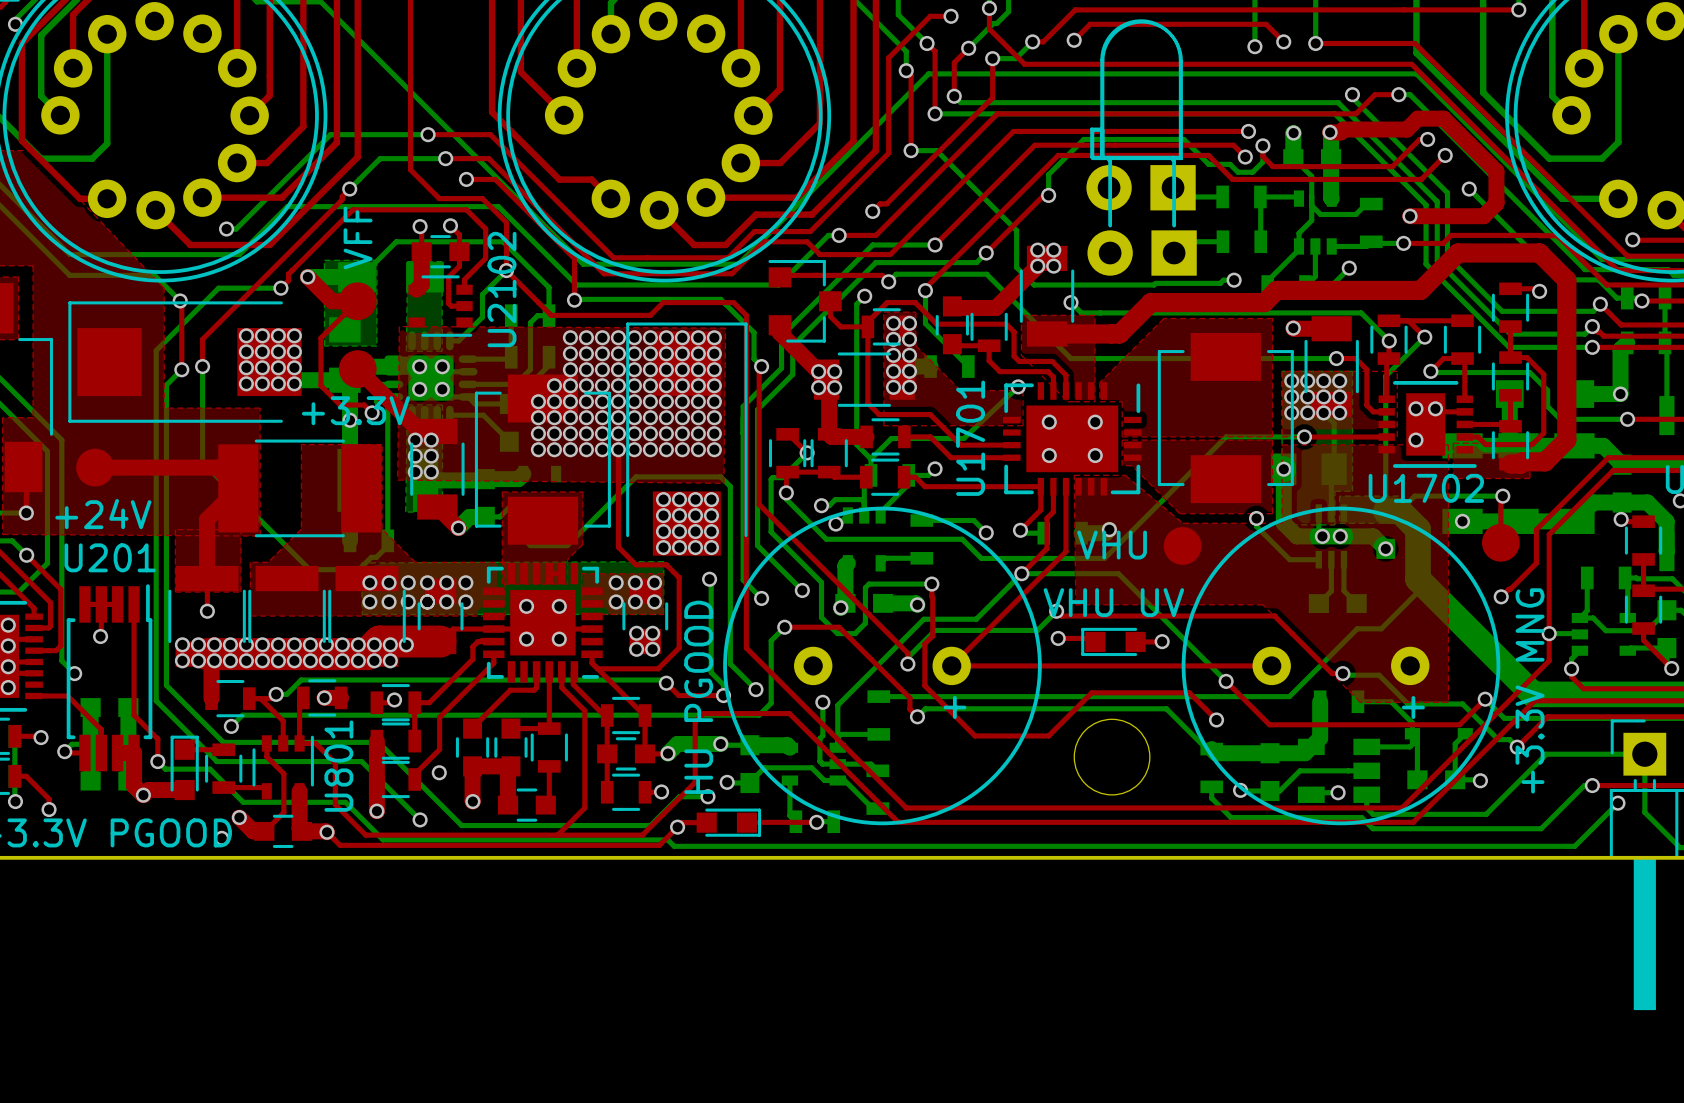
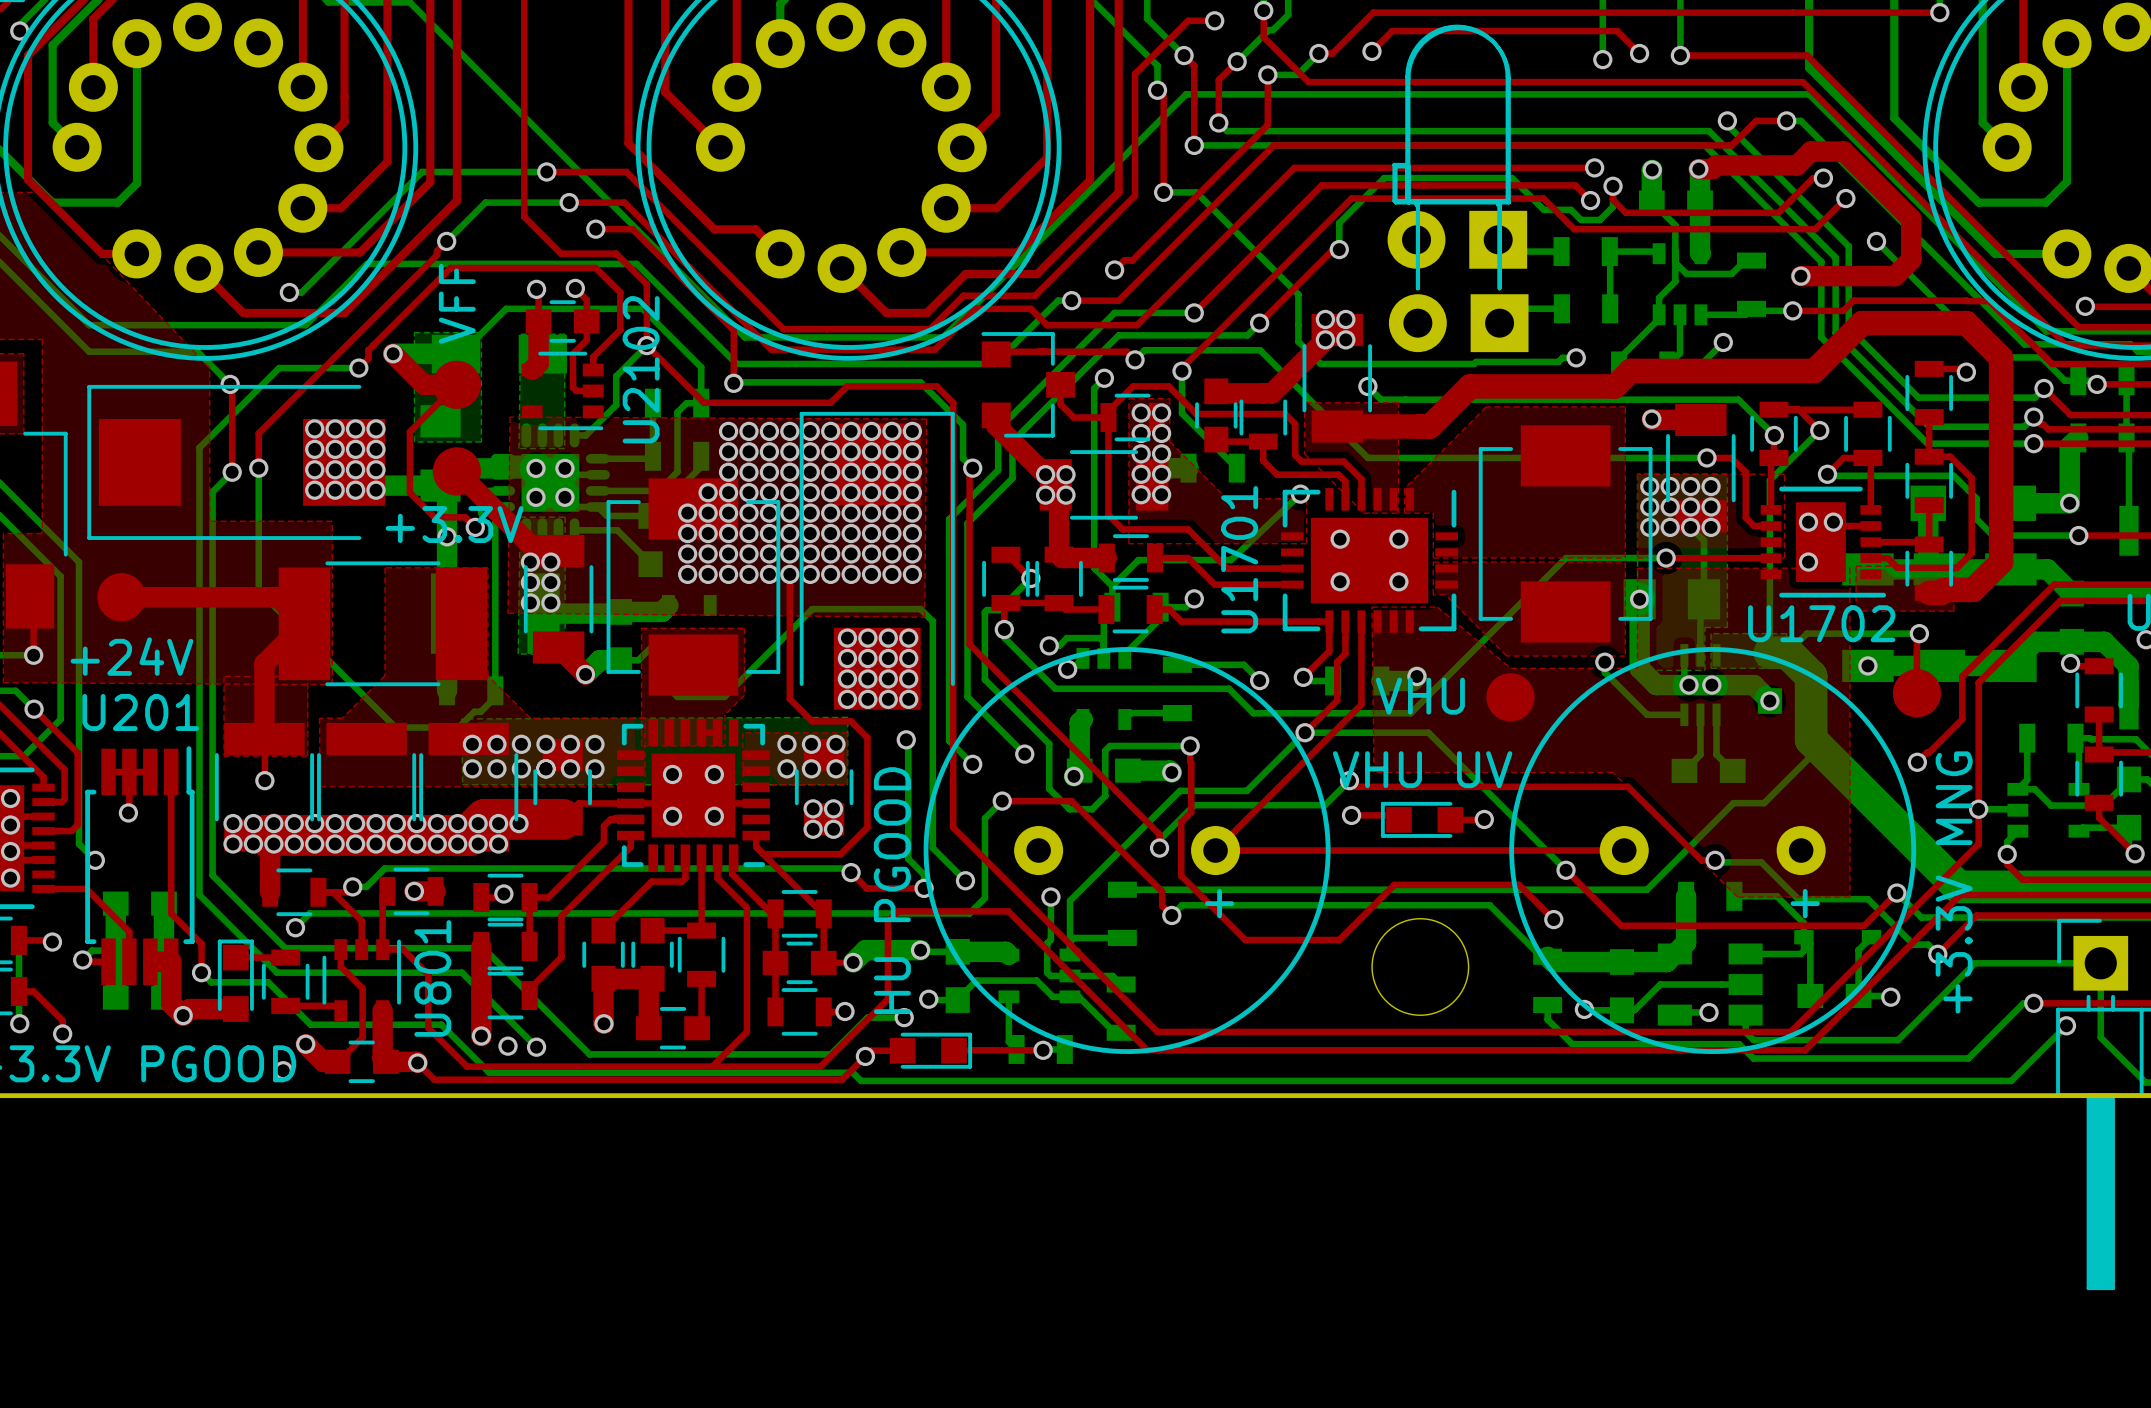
via position: (439, 772) -> (508, 1046)

